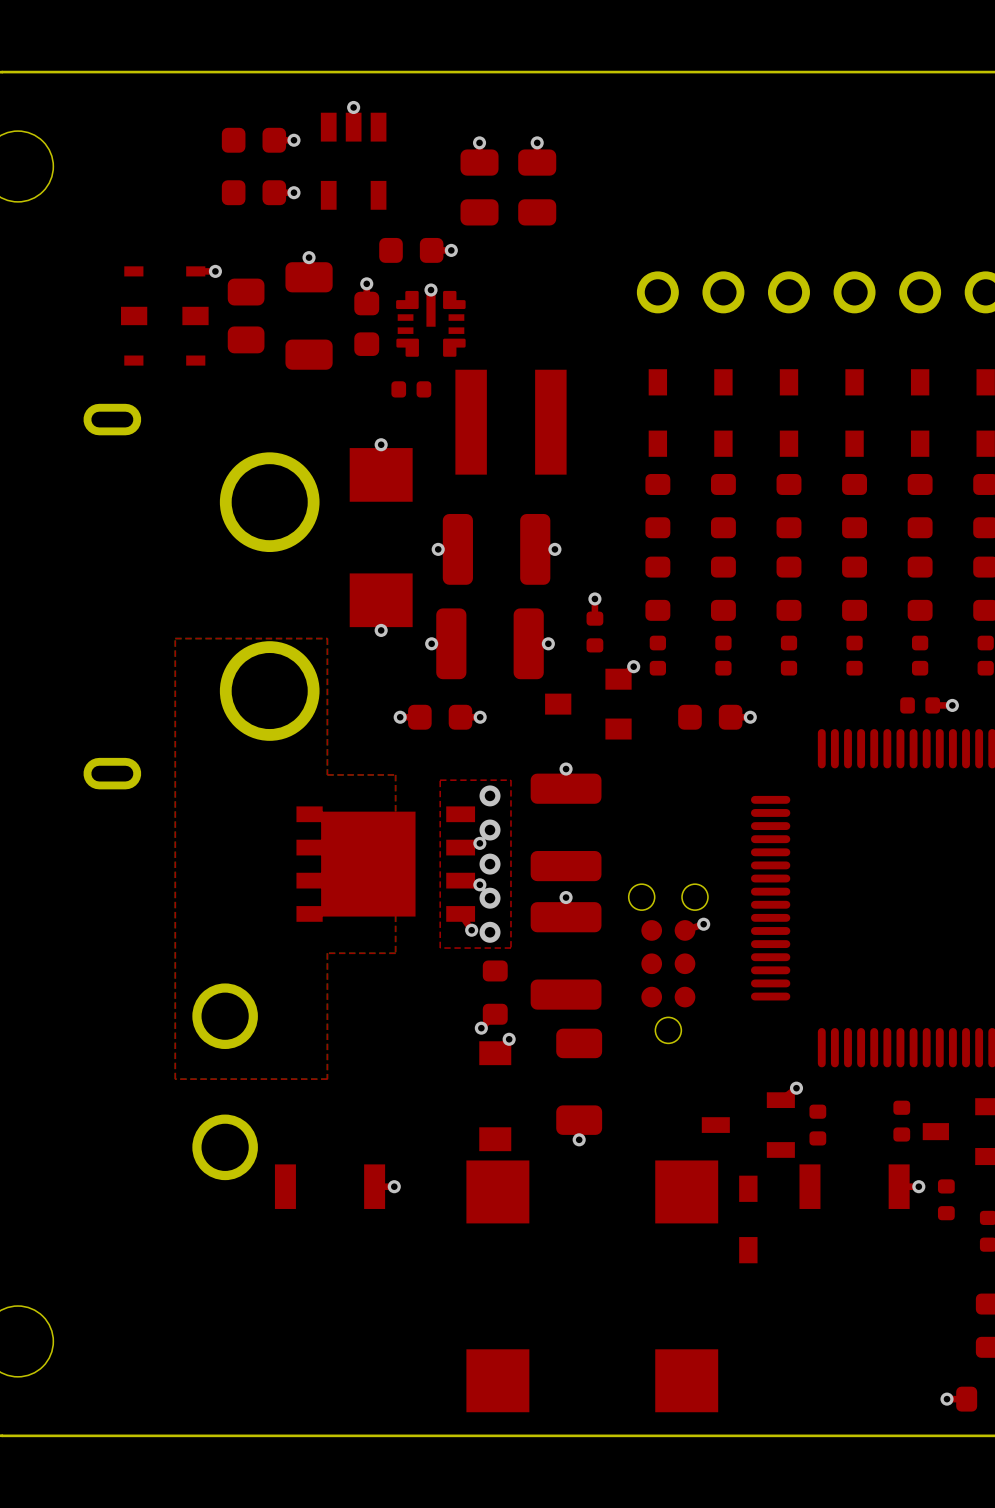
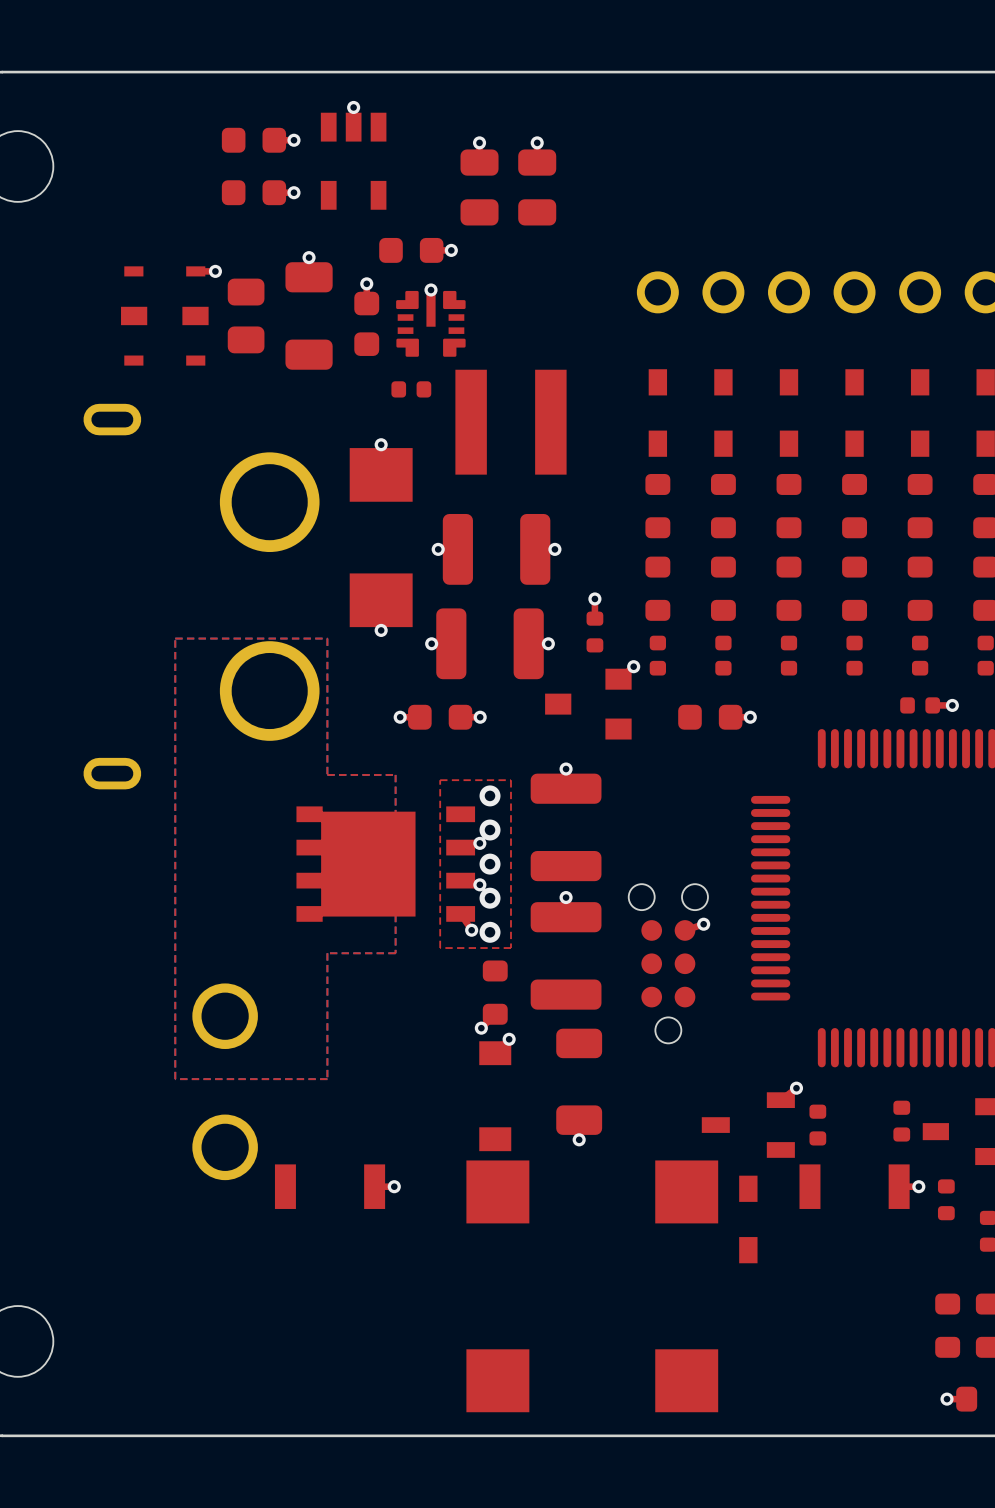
part: none -> (947, 1325)

